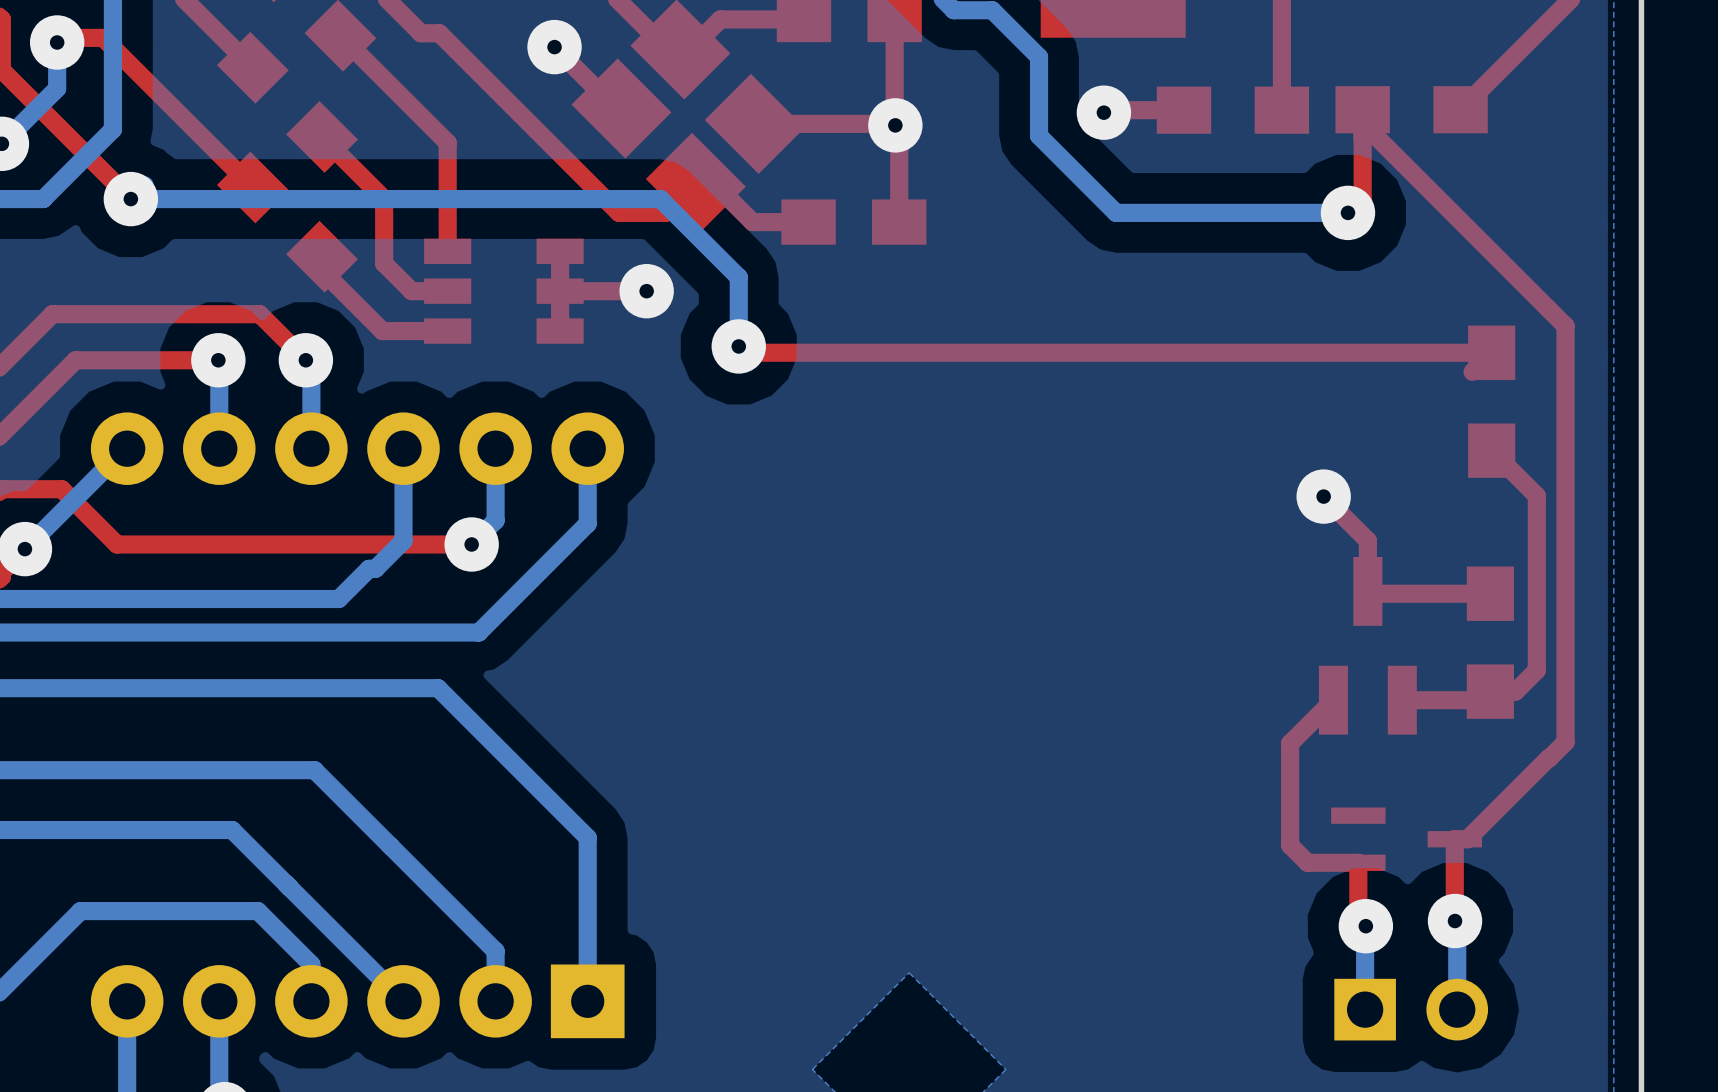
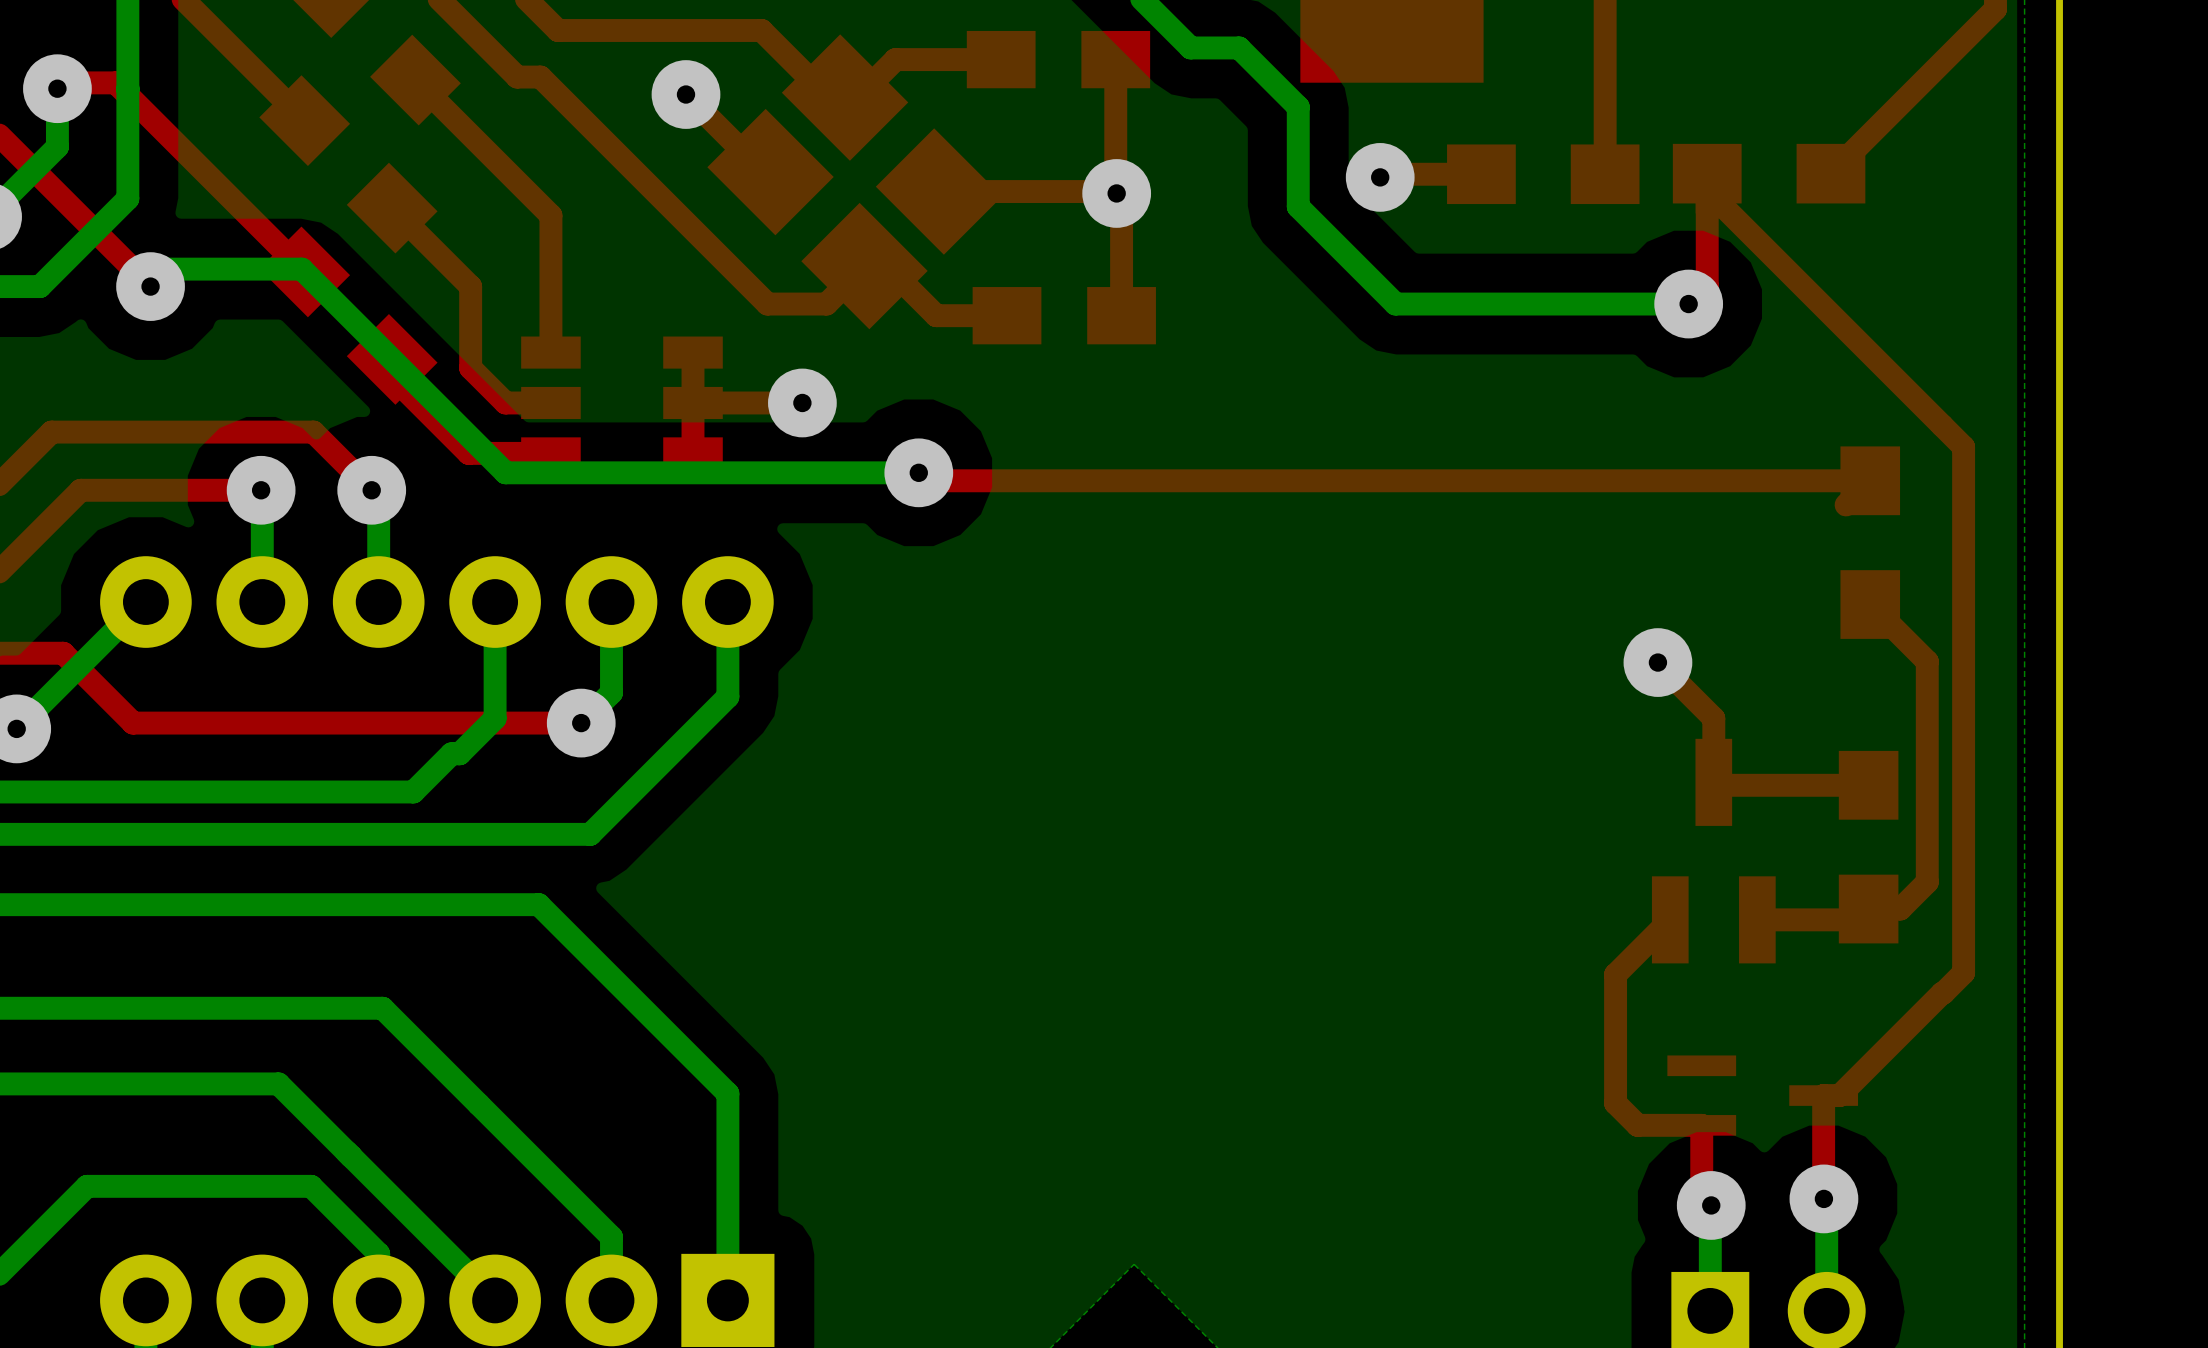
bottom track: (130, 199) (660, 199) (738, 277) (738, 346) -> (168, 269) (301, 269) (505, 472) (918, 472)

